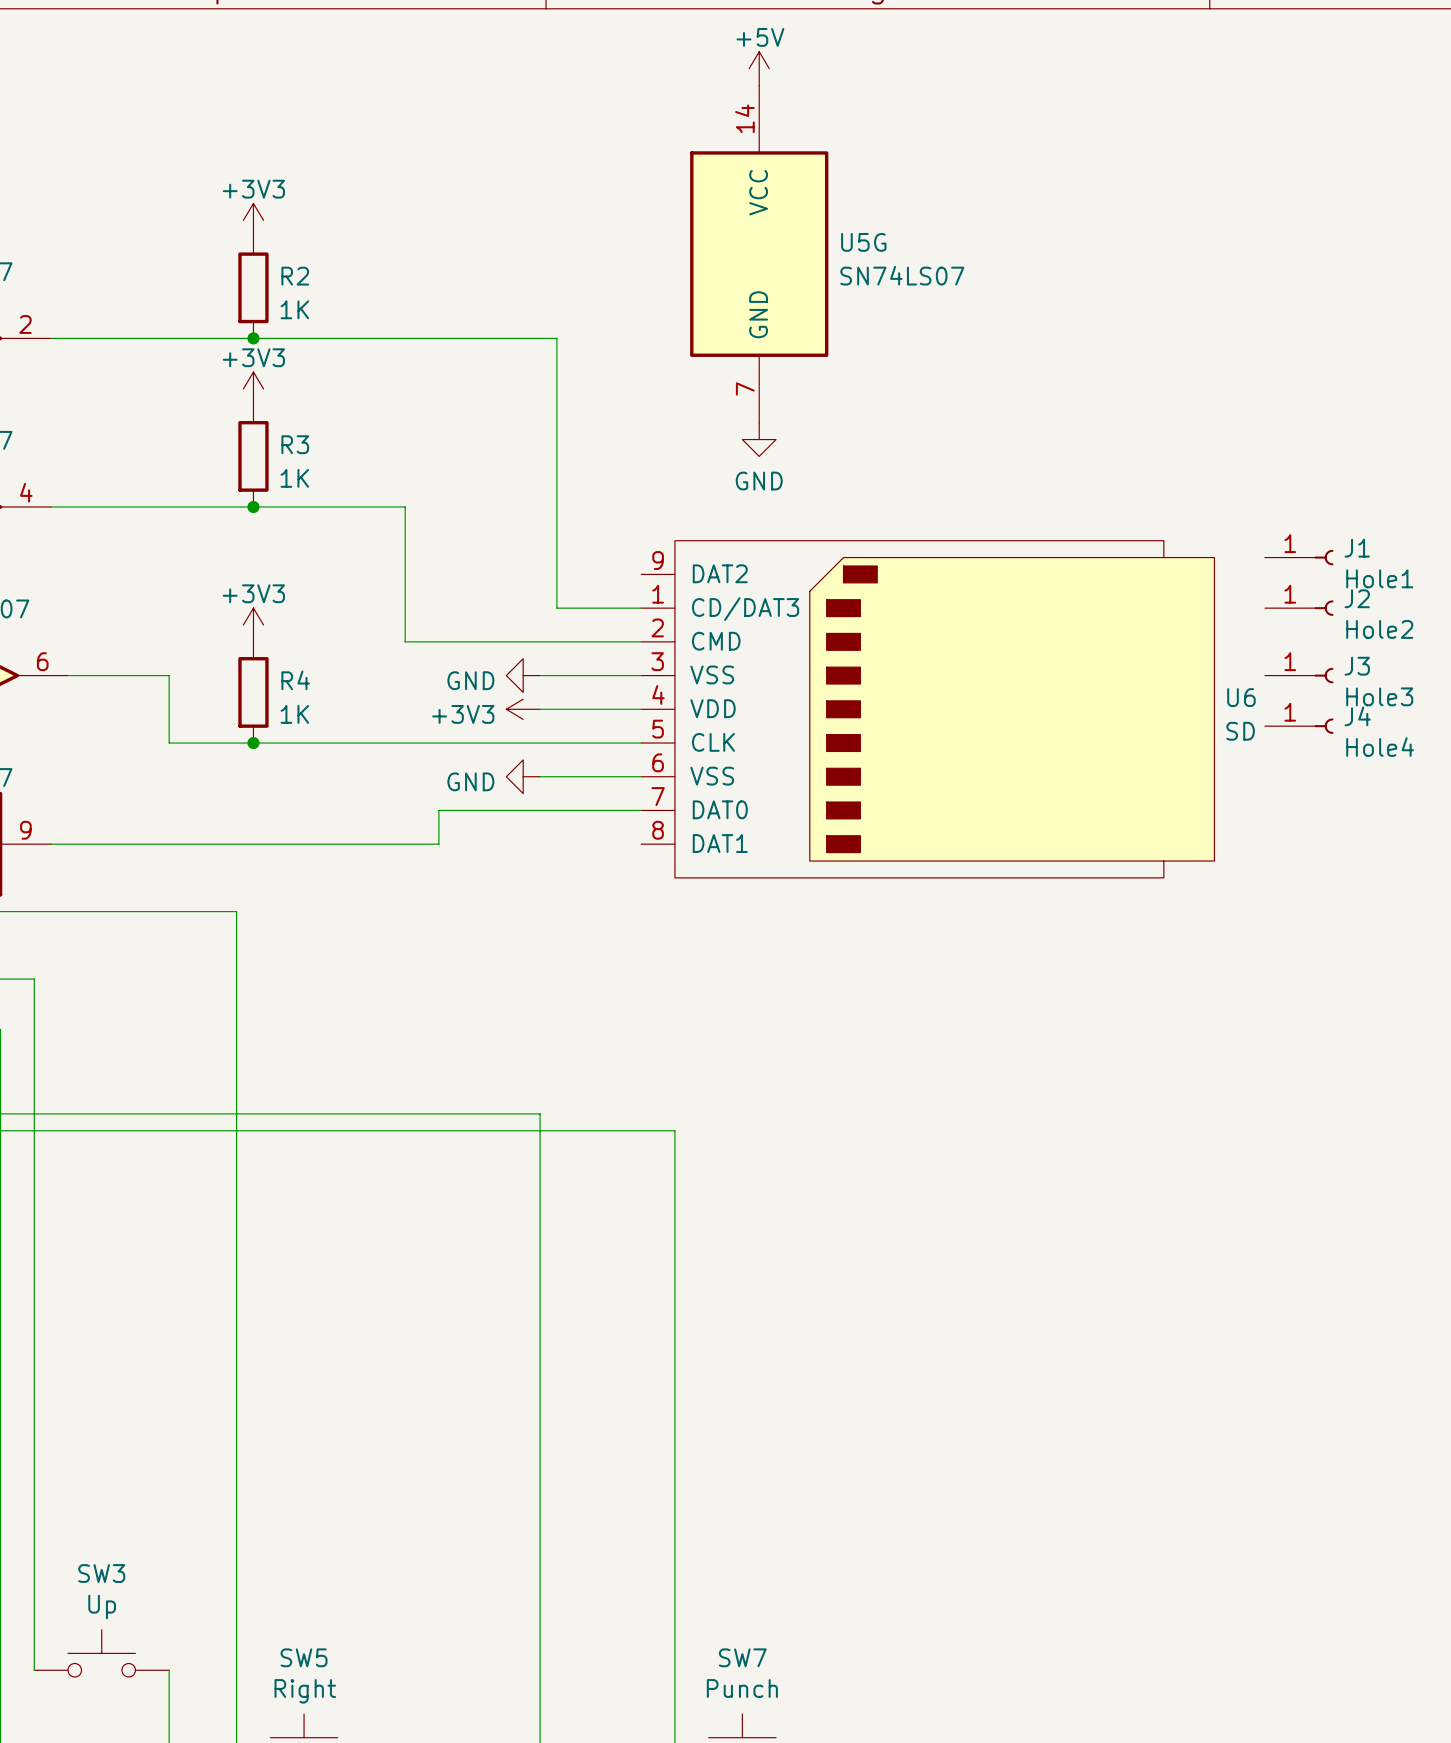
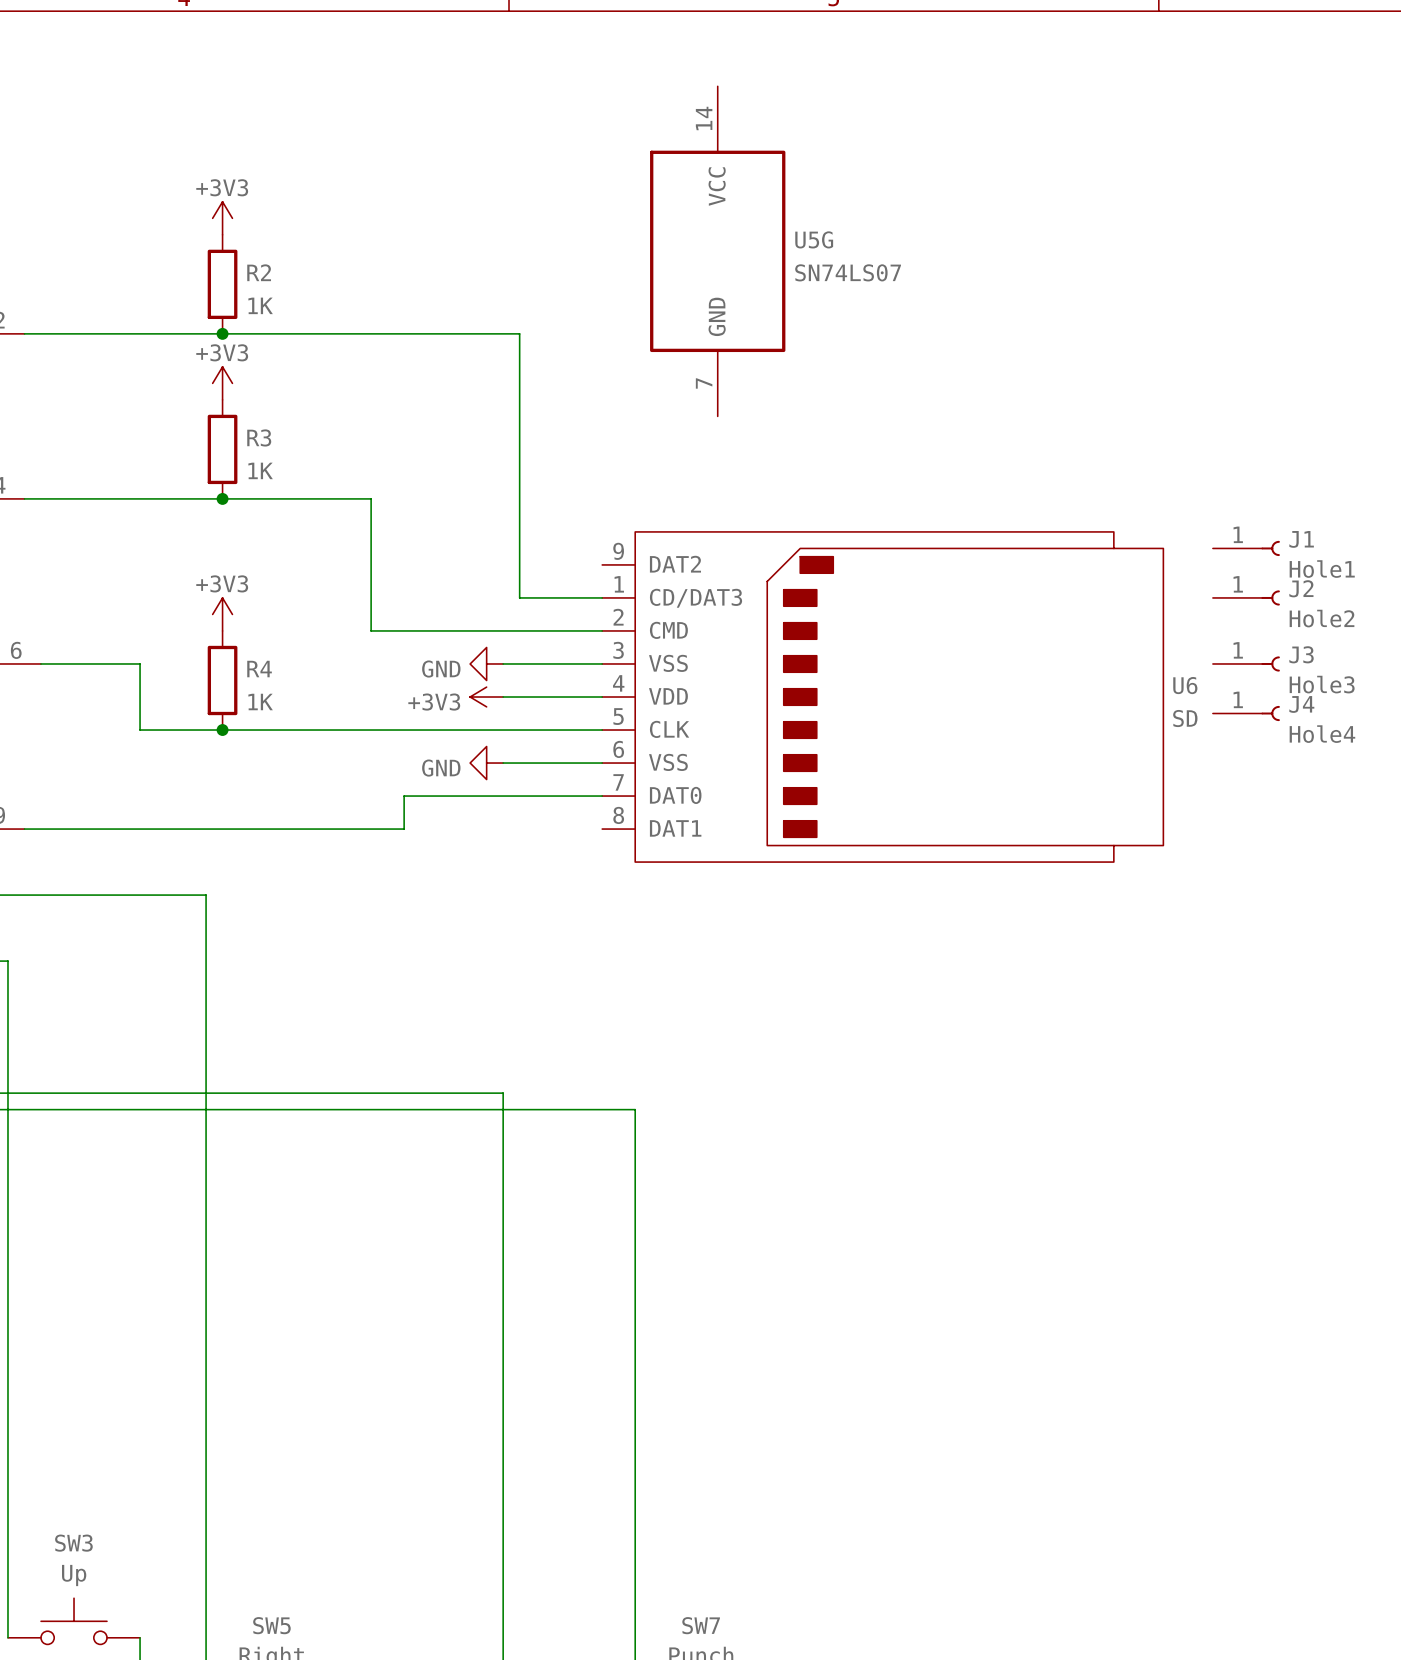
power symbol: +5V (759, 68) -> none
power symbol: GND (759, 439) -> none

